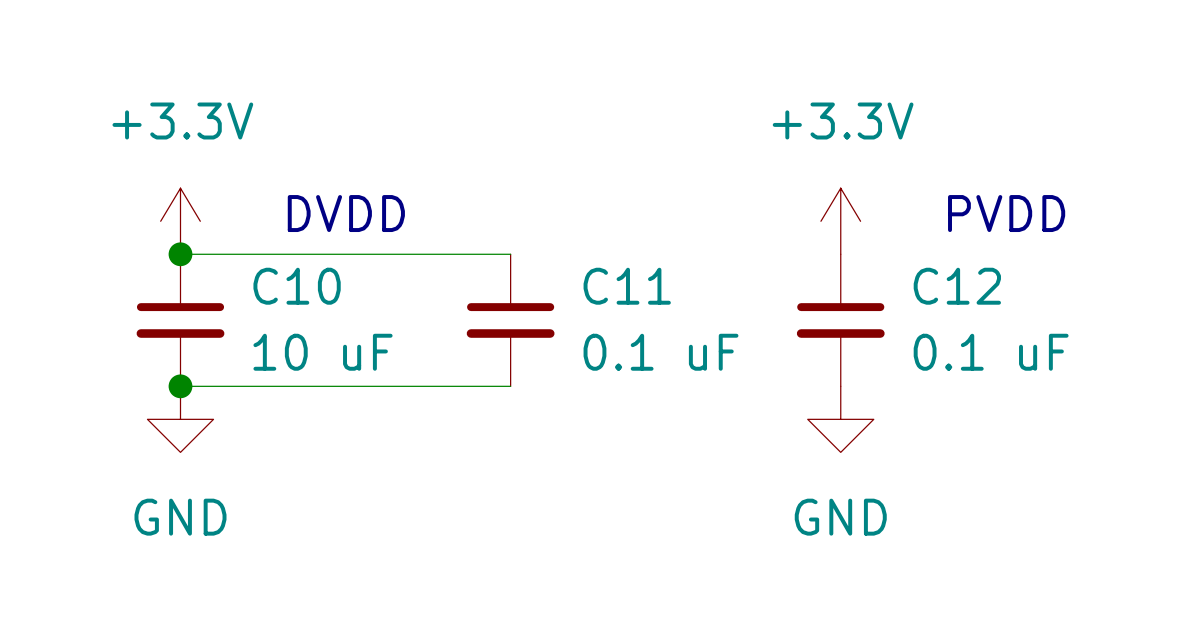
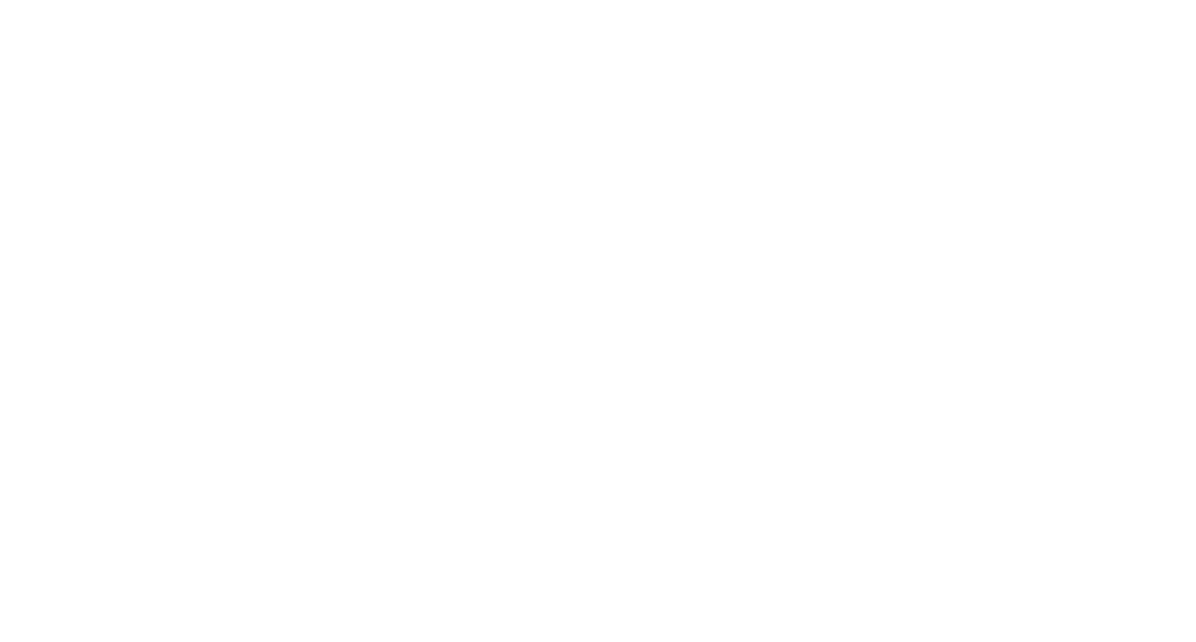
text: DVDD (346, 213) -> none
text: PVDD (1006, 213) -> none
power symbol: +3.3V (180, 221) -> none
power symbol: +3.3V (840, 221) -> none
wire: (180, 254) (510, 254) -> none
junction: (180, 254) -> none
C10: 10 uF (180, 320) -> none
C11: 0.1 uF (510, 320) -> none
C12: 0.1 uF (840, 320) -> none
wire: (180, 386) (510, 386) -> none
junction: (180, 386) -> none
power symbol: GND (180, 419) -> none
power symbol: GND (840, 419) -> none

